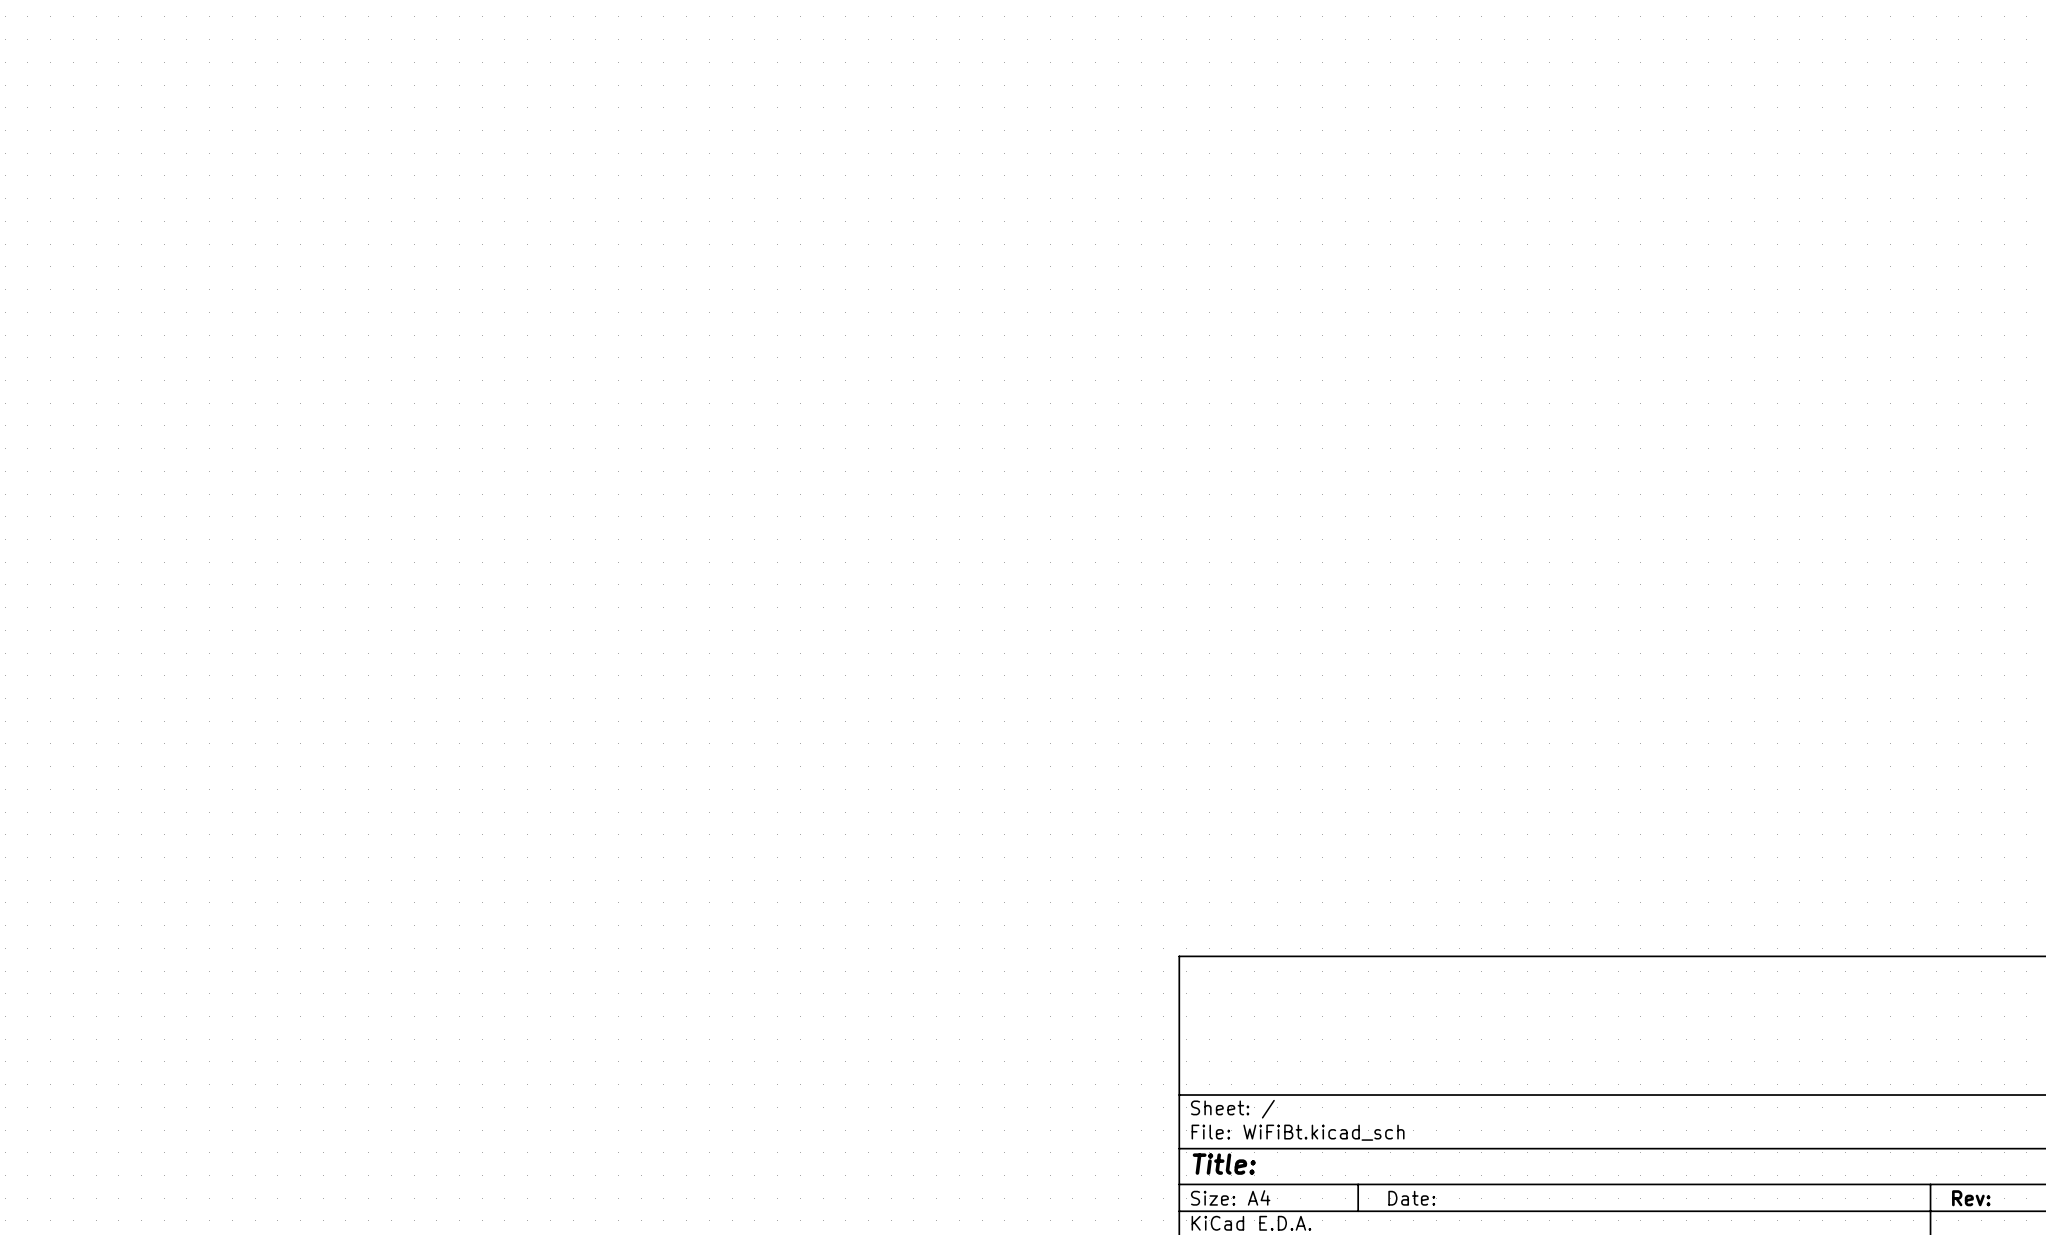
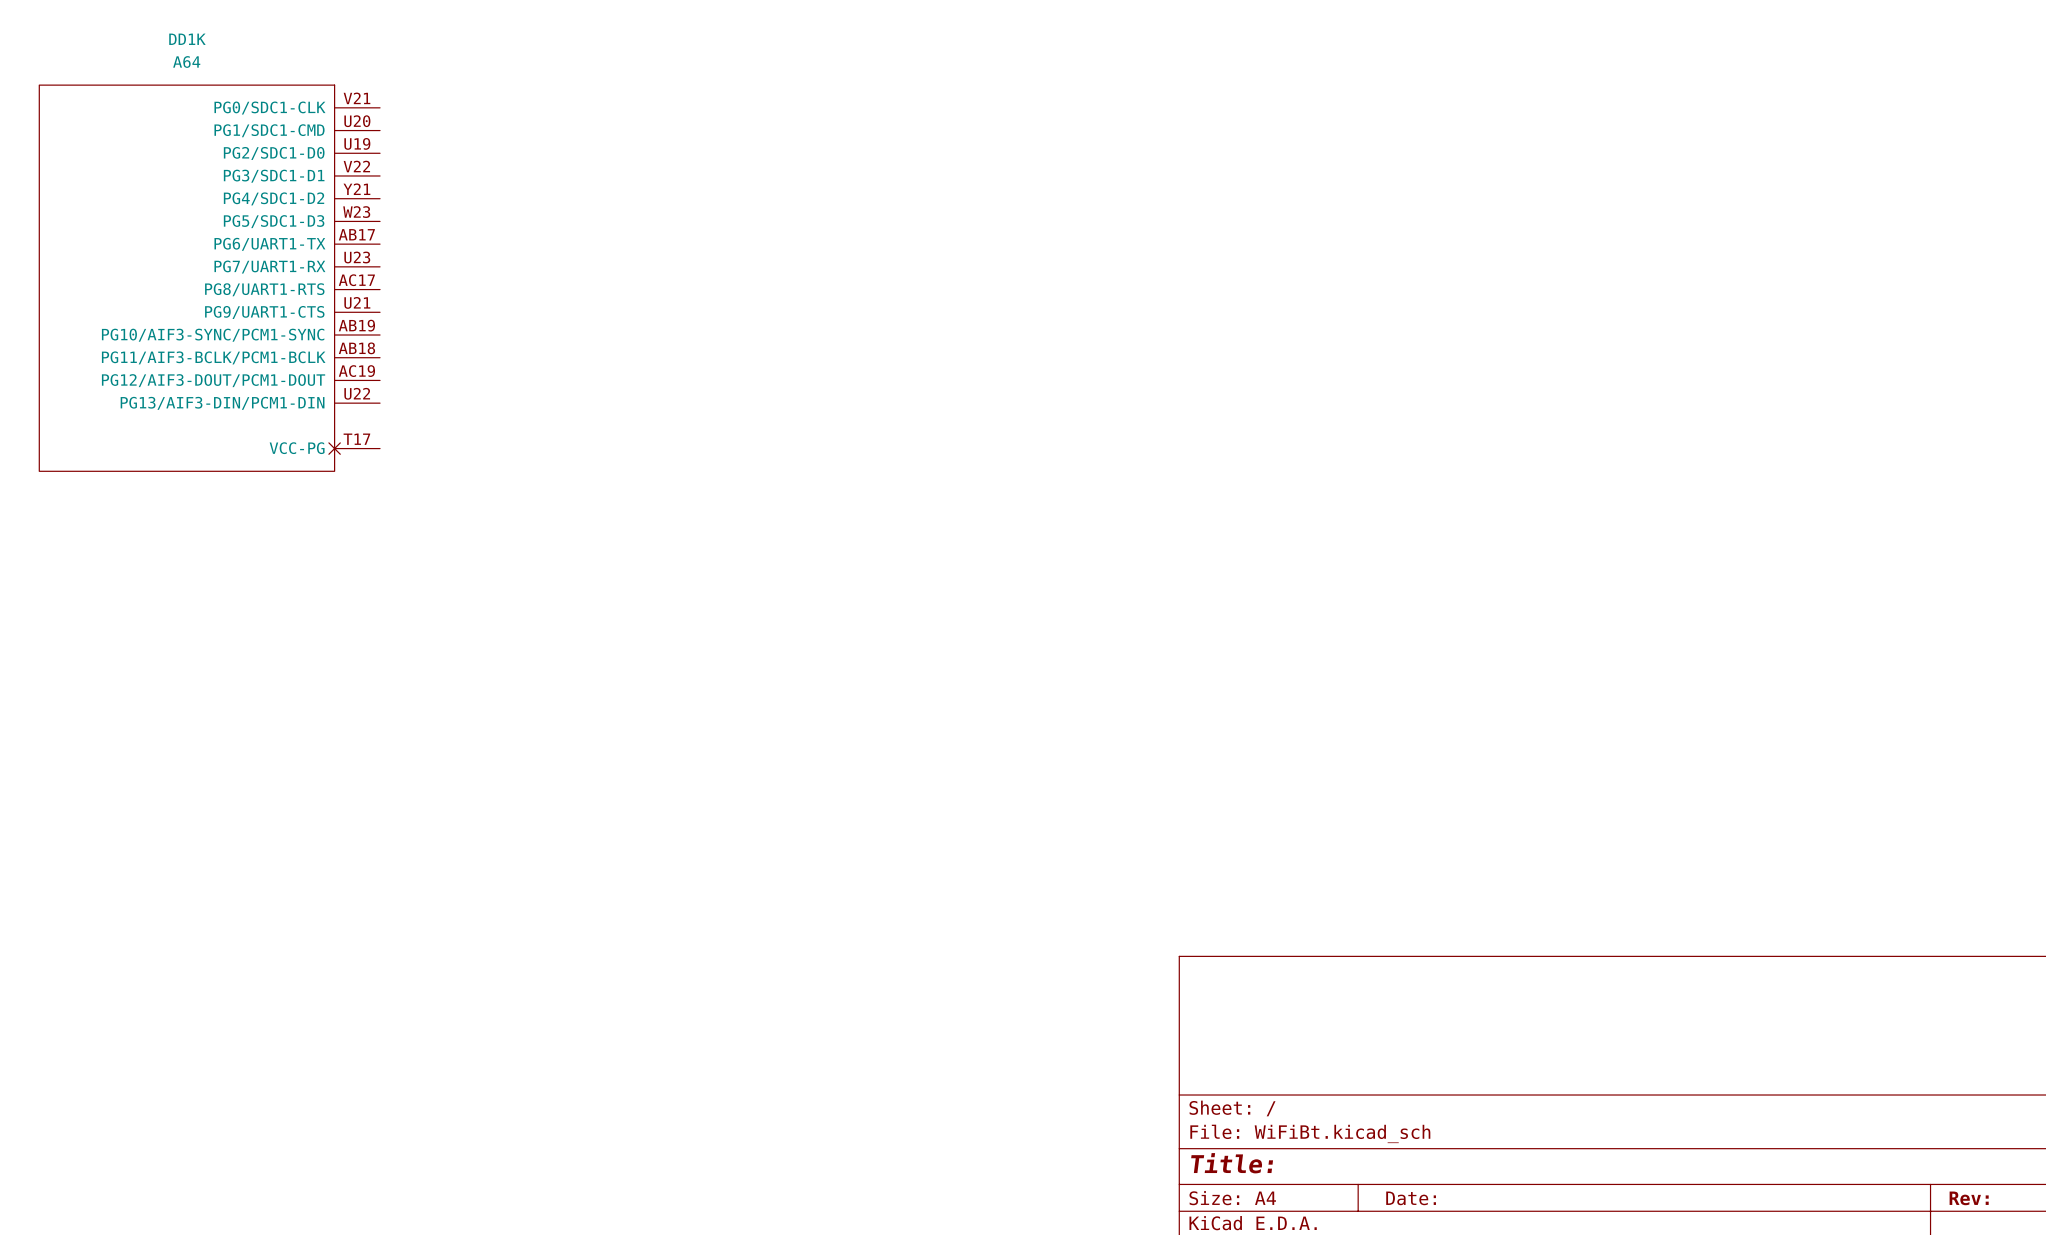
DD1K: none -> A64 (209, 278)

